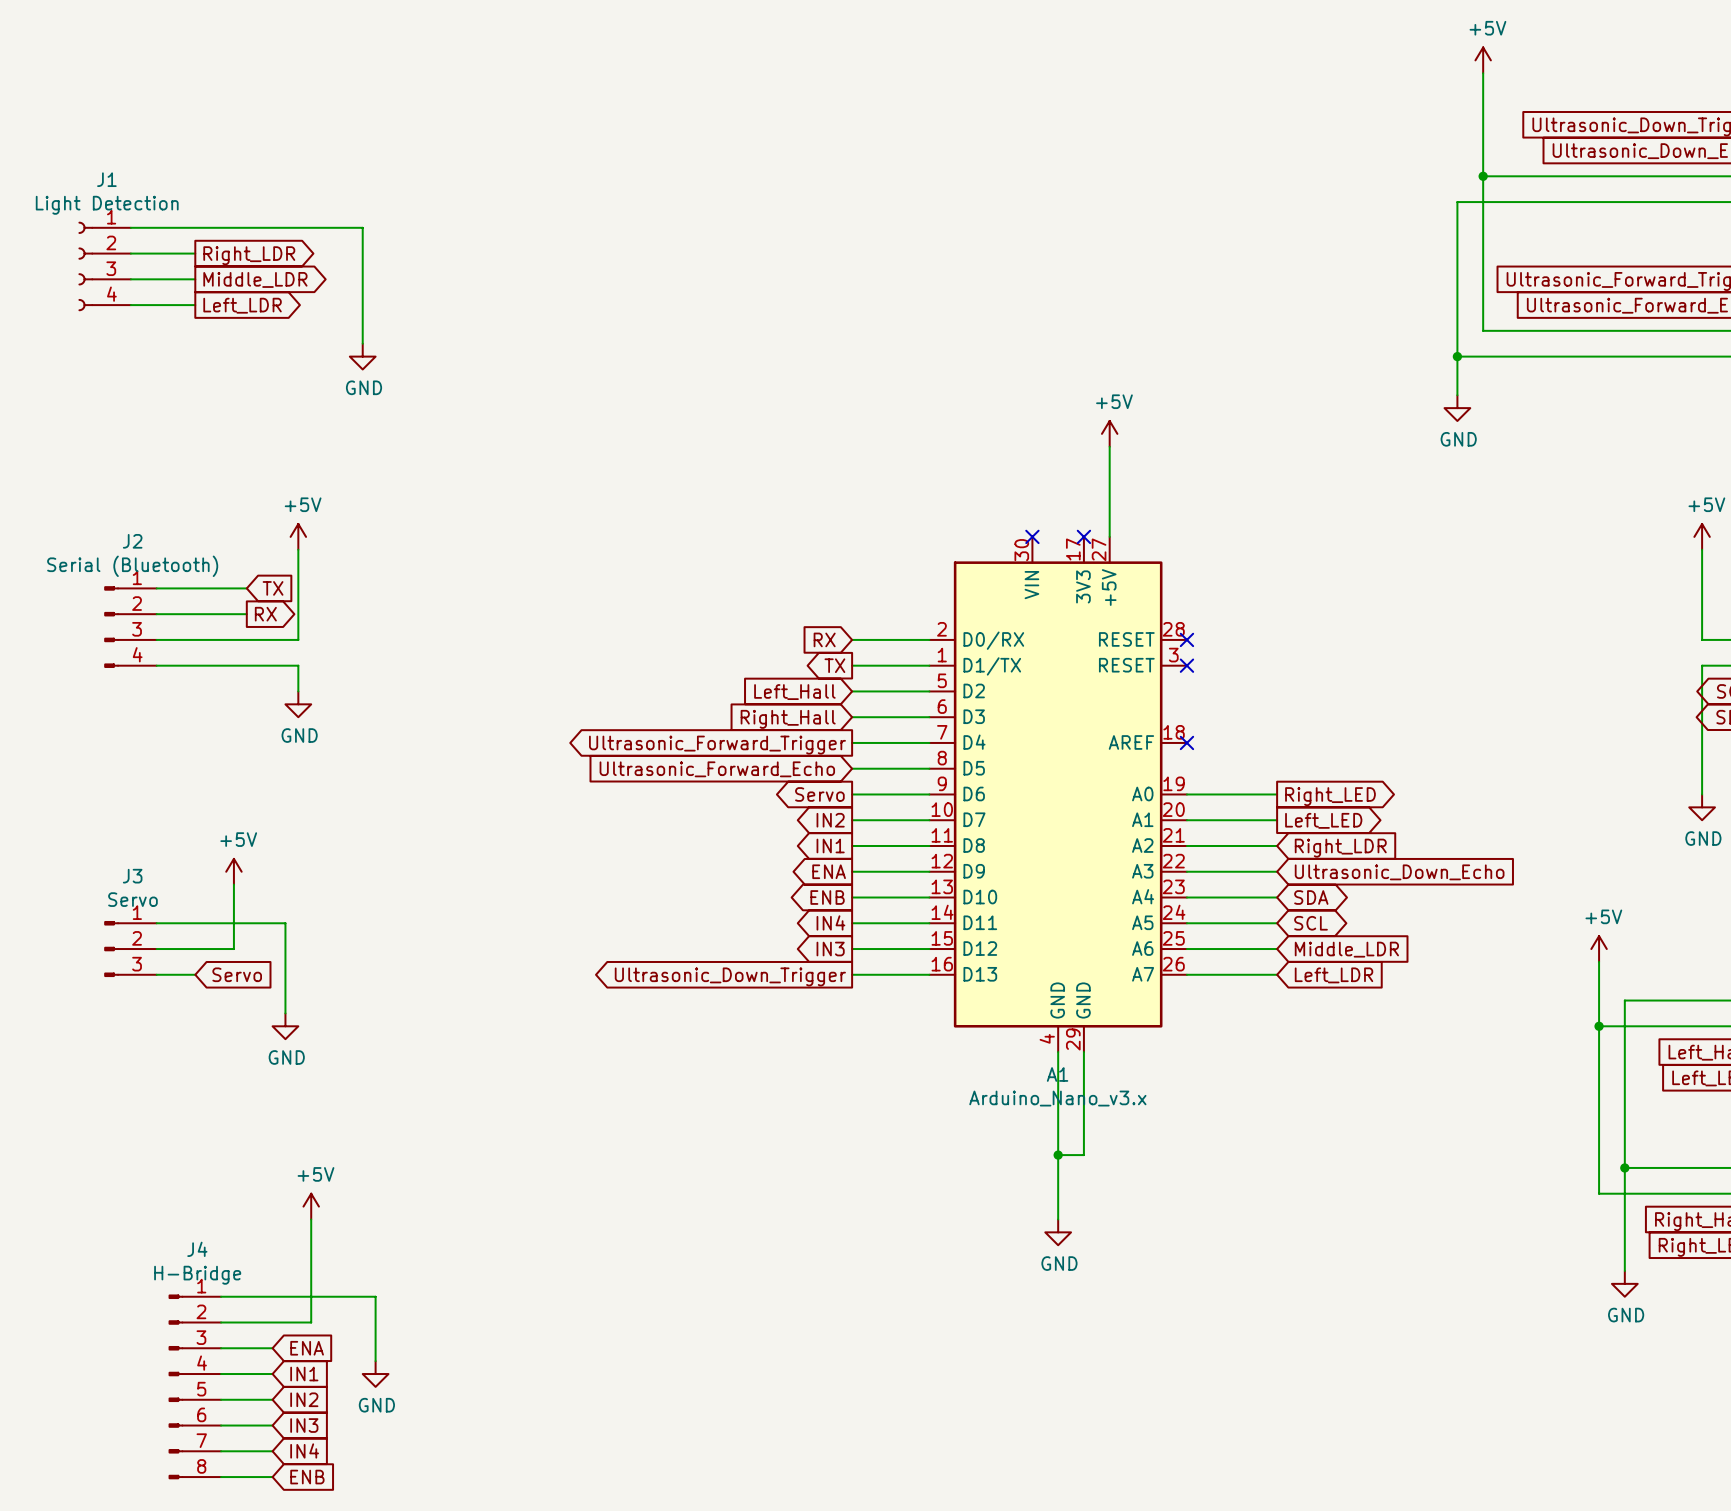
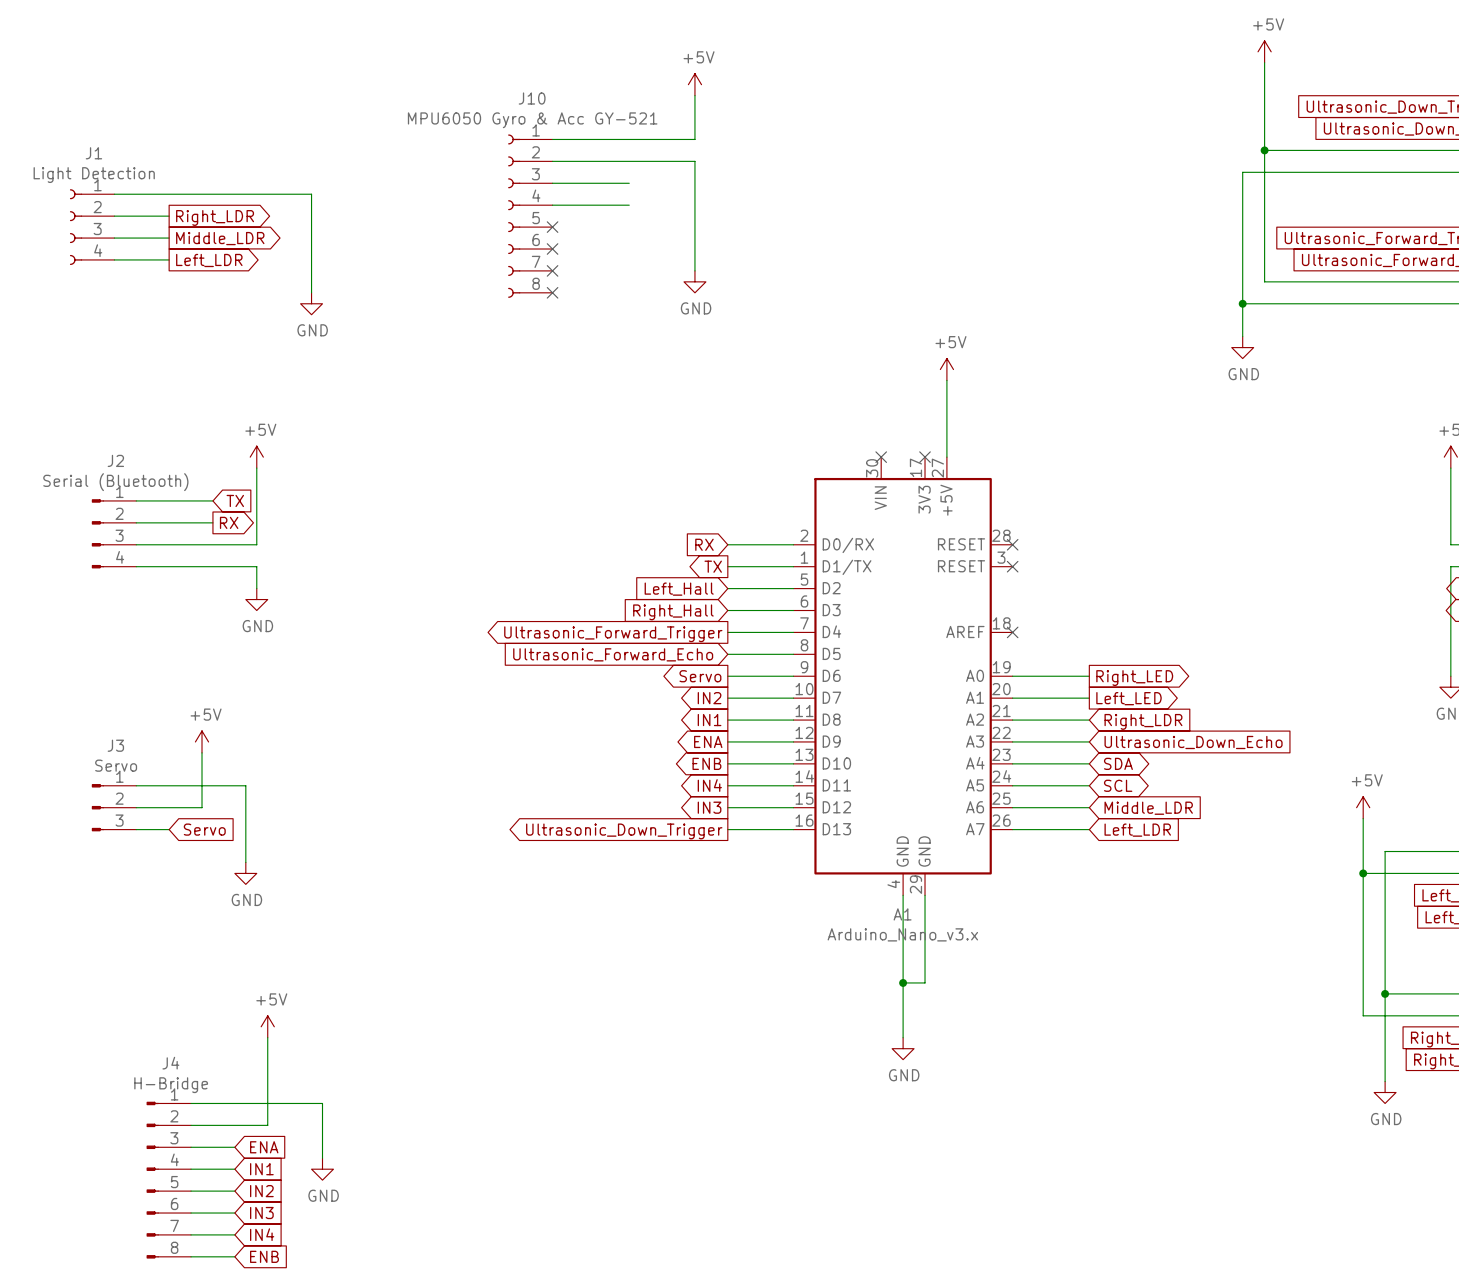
power symbol: none -> +5V (694, 84)
wire: none -> (694, 95) (694, 139) (552, 139)
wire: none -> (552, 161) (694, 161) (694, 270)
wire: none -> (552, 183) (629, 183)
wire: none -> (552, 205) (629, 205)
J10: none -> MPU6050 Gyro & Acc GY-521 (530, 216)
no-connect mark: none -> (552, 227)
no-connect mark: none -> (552, 249)
no-connect mark: none -> (552, 270)
power symbol: none -> GND (694, 281)
no-connect mark: none -> (552, 292)

